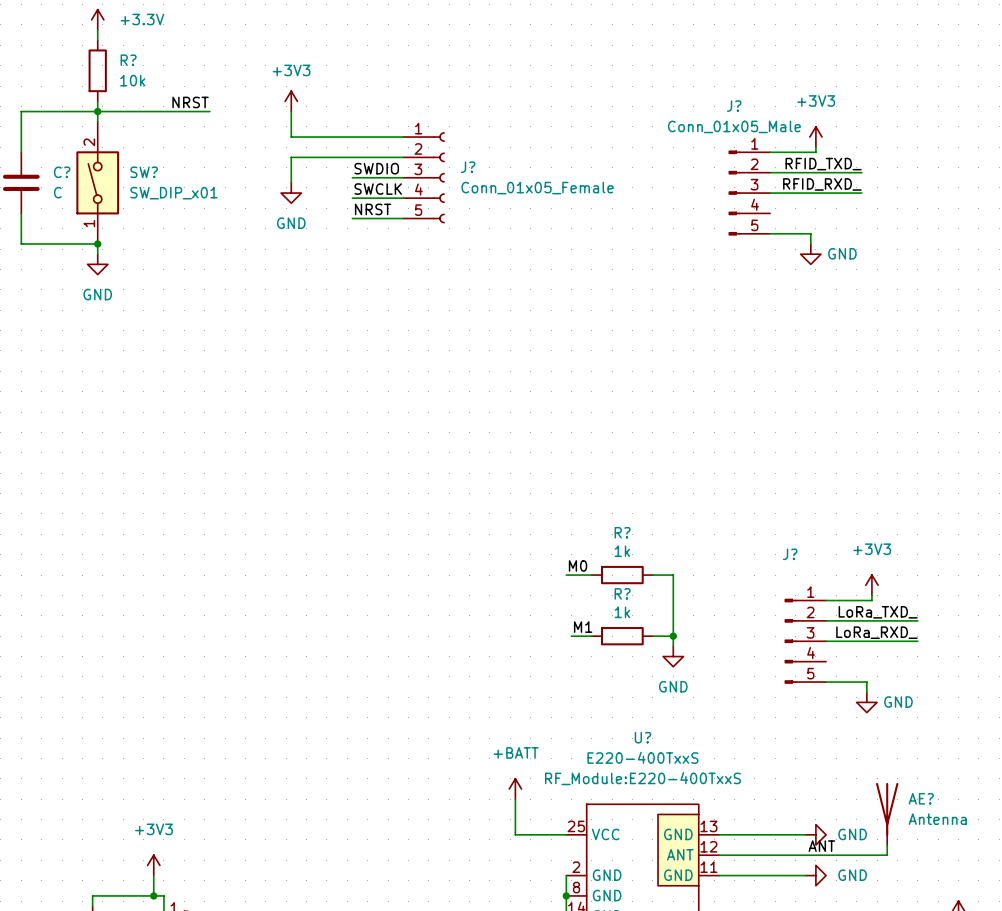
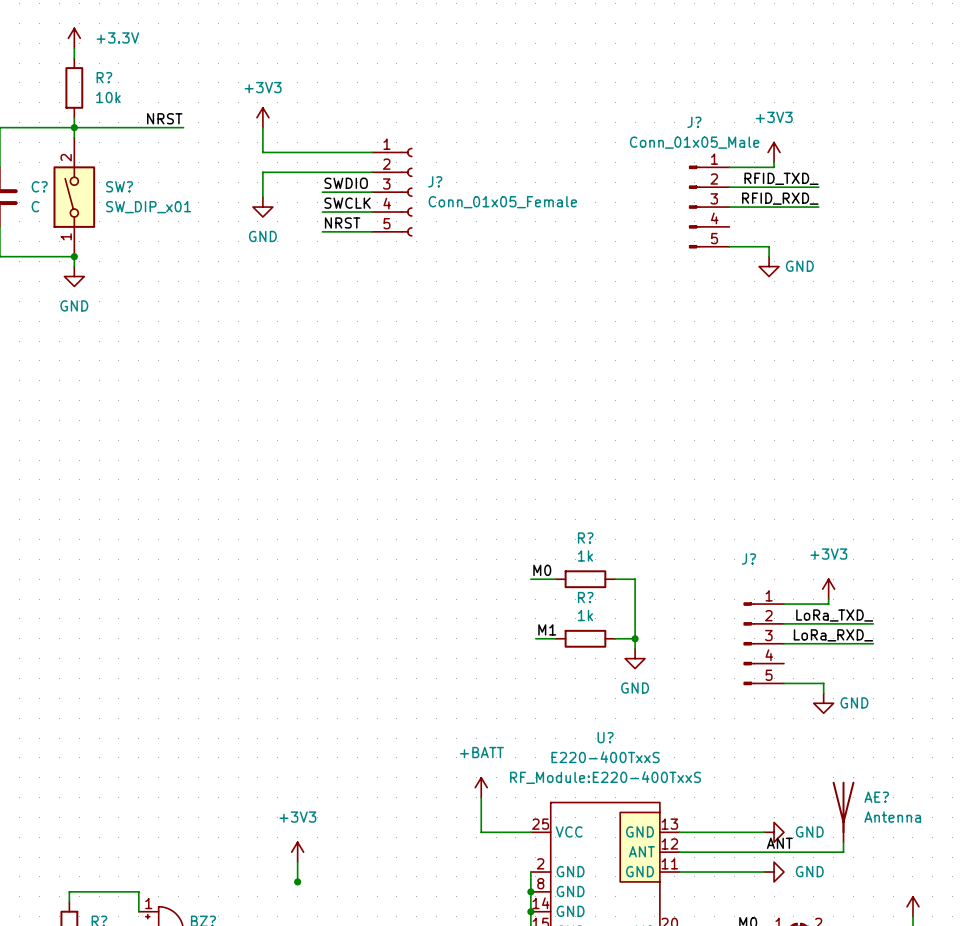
power symbol position: +3V3 (153, 865) -> +3V3 (297, 852)
wire: (153, 875) (153, 895) -> (297, 862) (297, 881)
junction: none -> (297, 881)
junction: (153, 895) -> none

